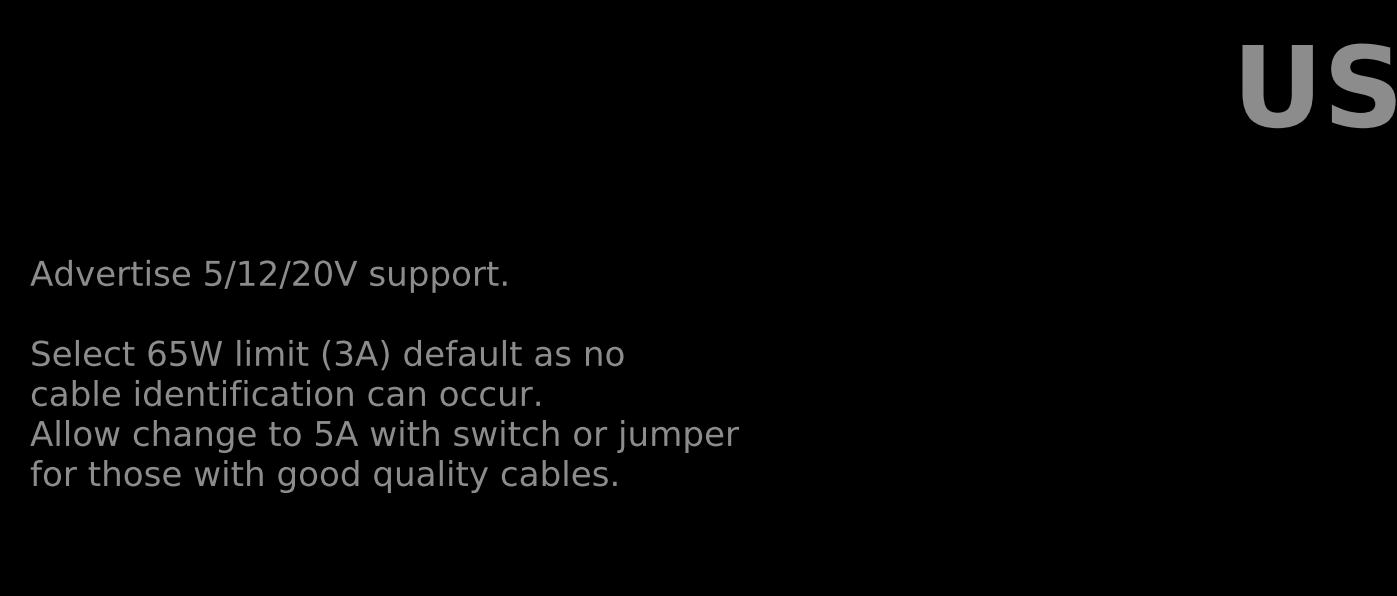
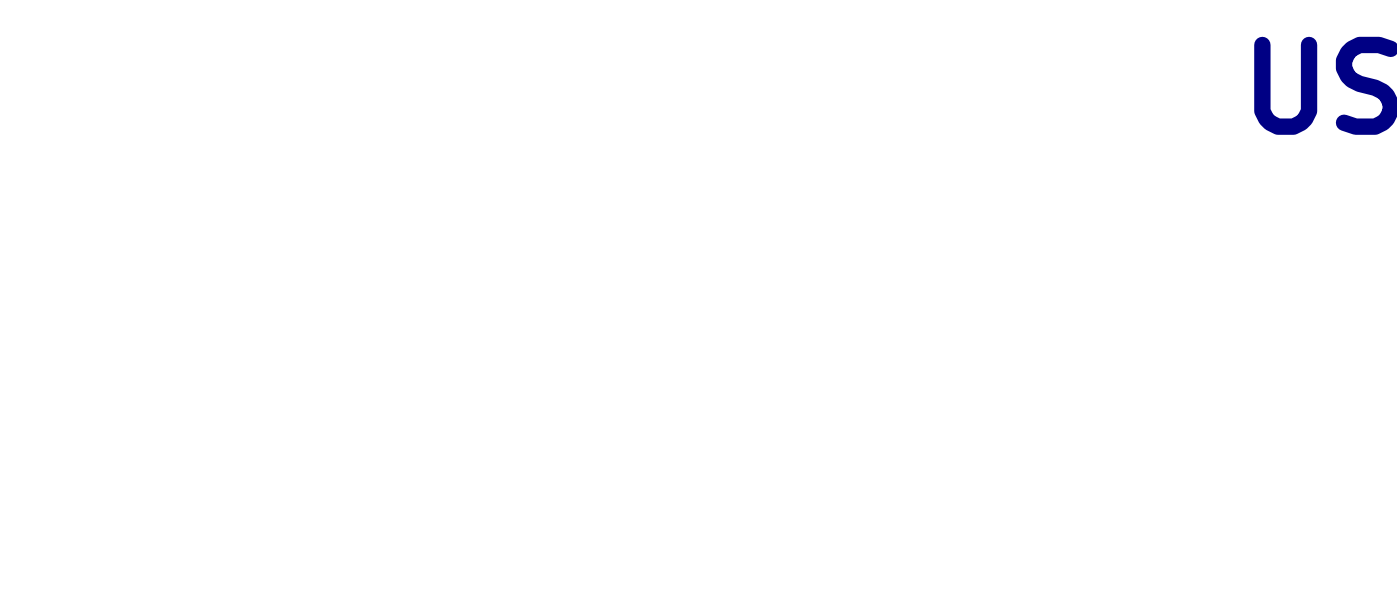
text: Advertise 5/12/20V support. (268, 276) -> none
text: Select 65W limit (3A) default as no (327, 355) -> none
text: cable identification can occur. (285, 393) -> none
text: Allow change to 5A with switch or jumper (384, 436) -> none
text: for those with good quality cables. (323, 476) -> none

